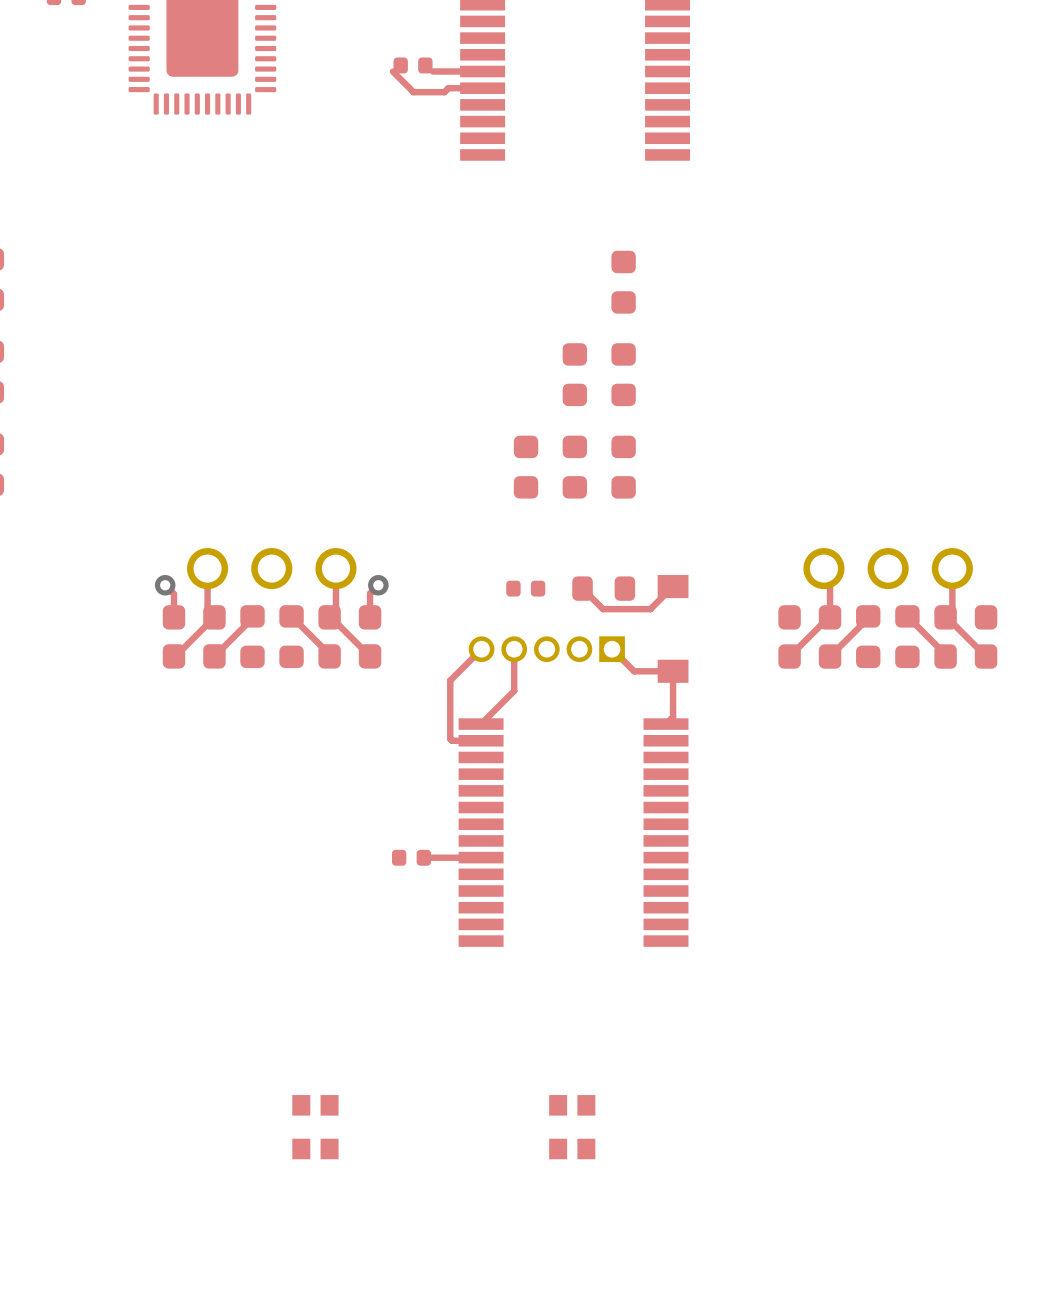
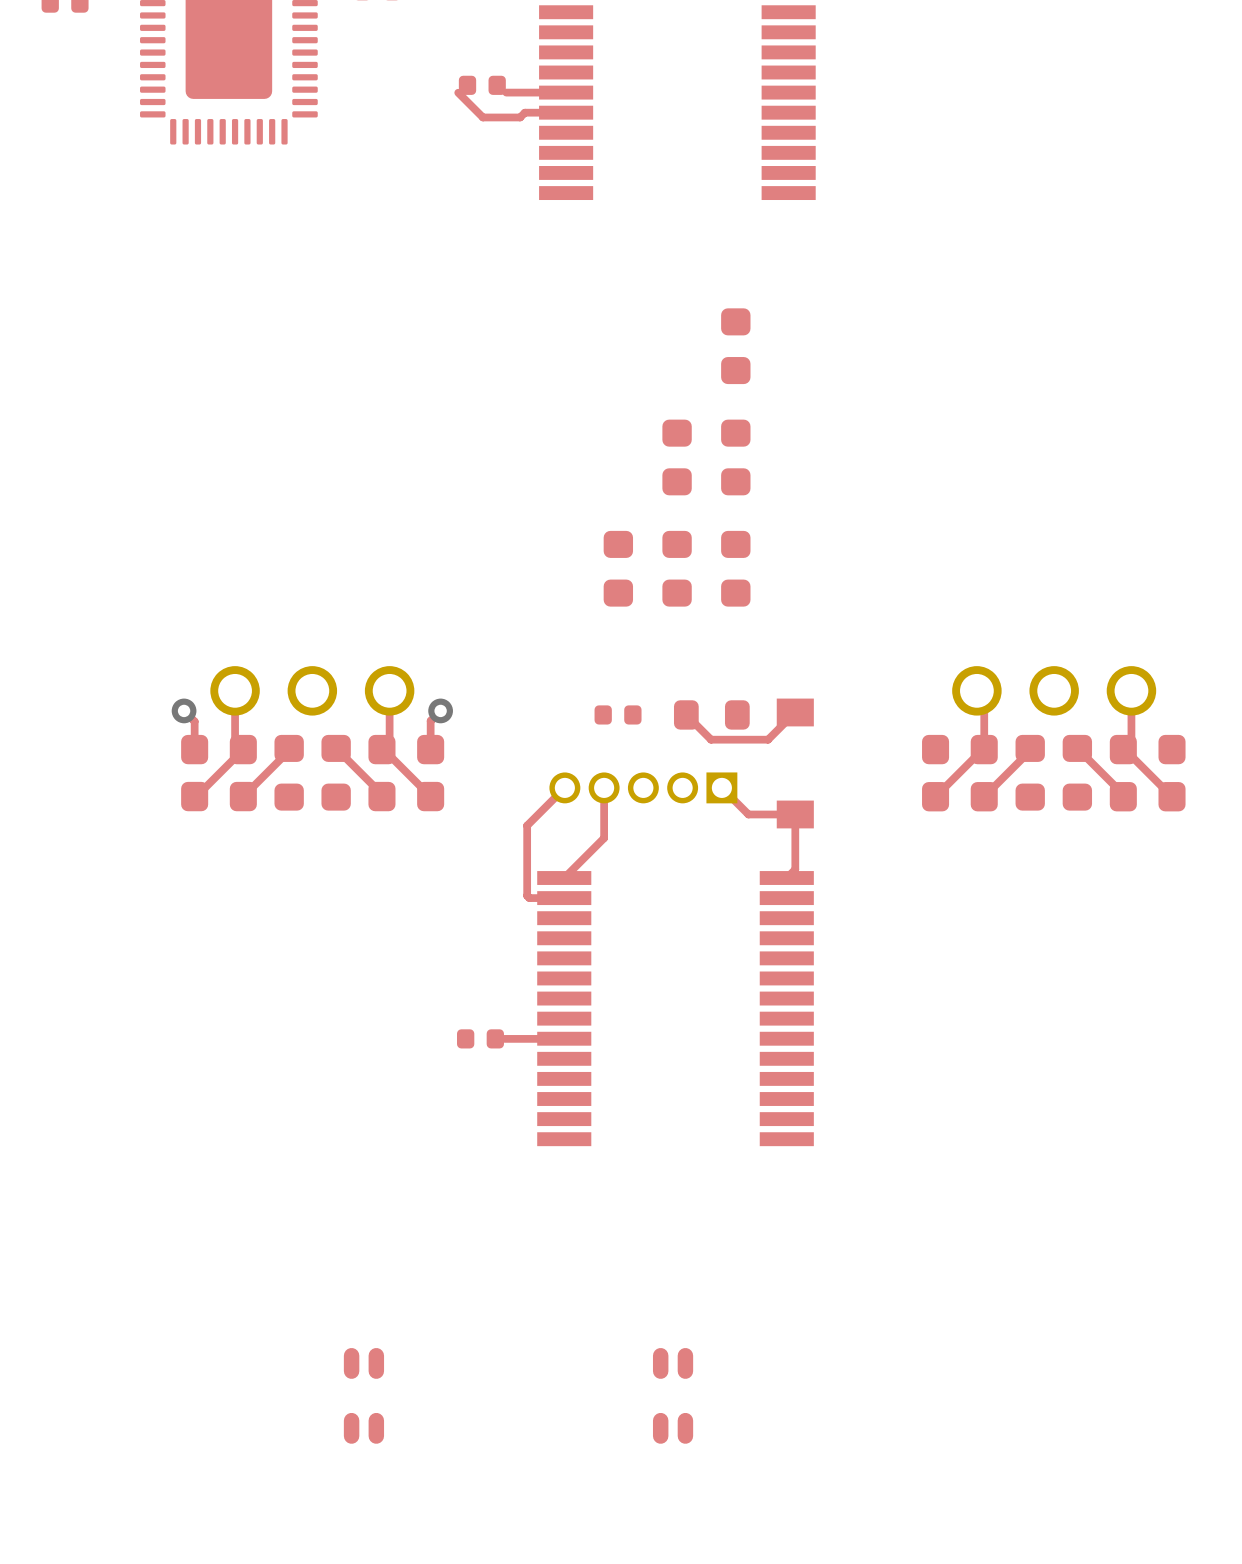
part: (315, 1127) -> none
part: (572, 1127) -> none
part: none -> (363, 1395)
part: none -> (673, 1395)

